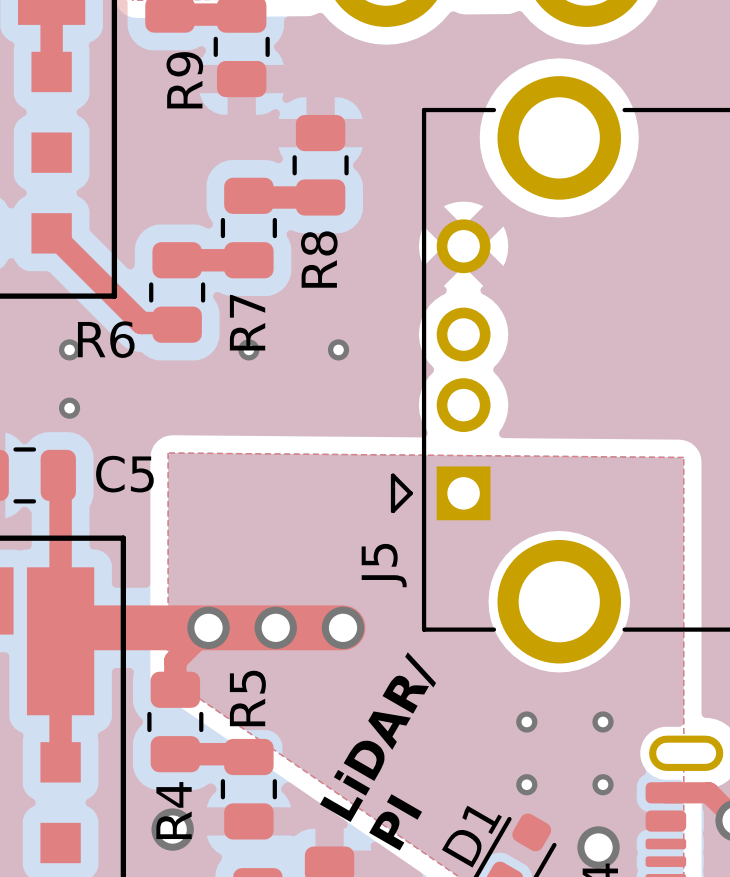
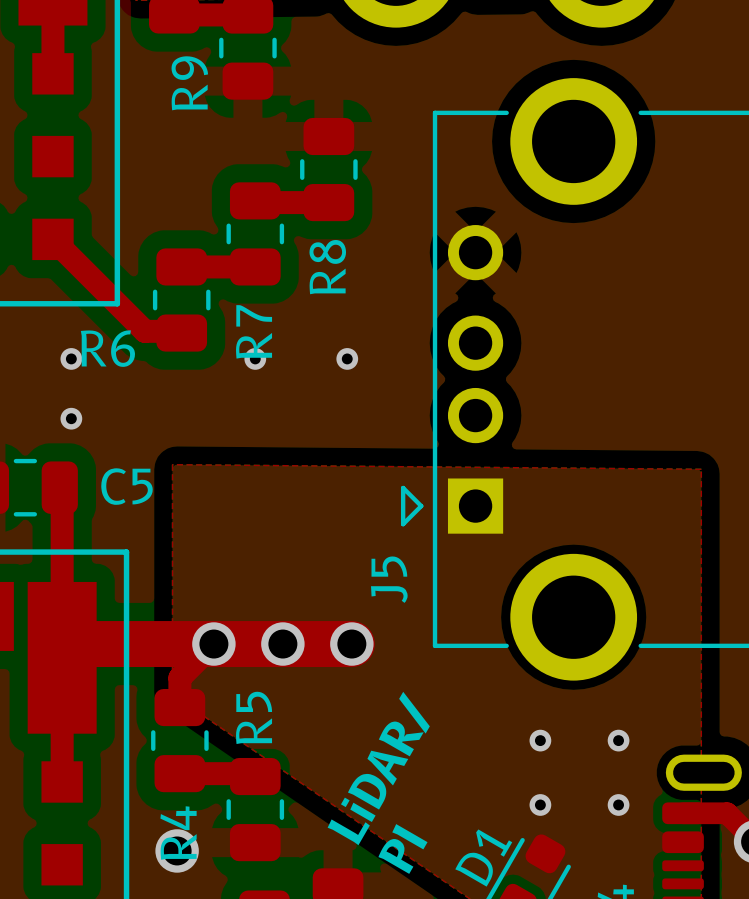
via: (598, 847) -> none

